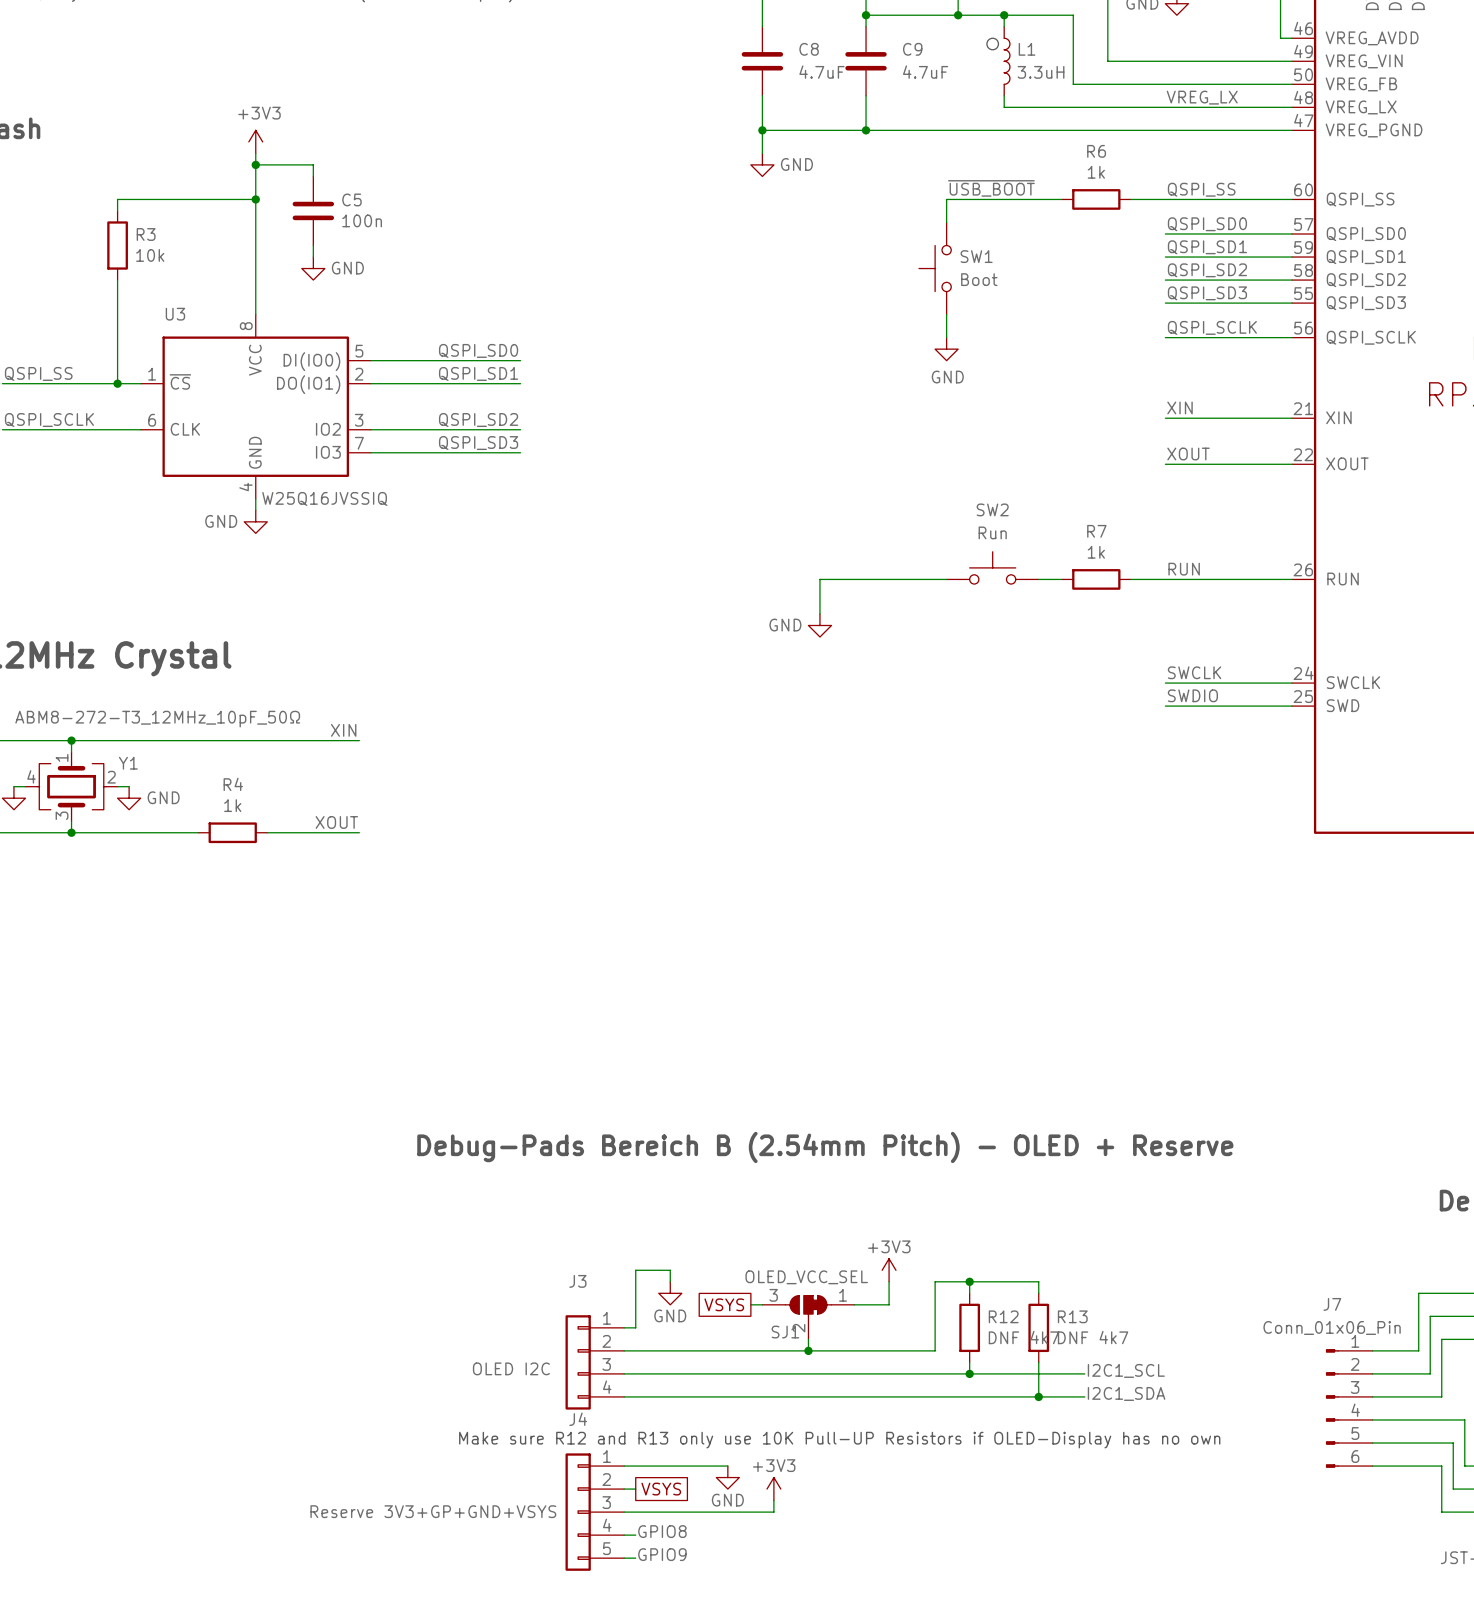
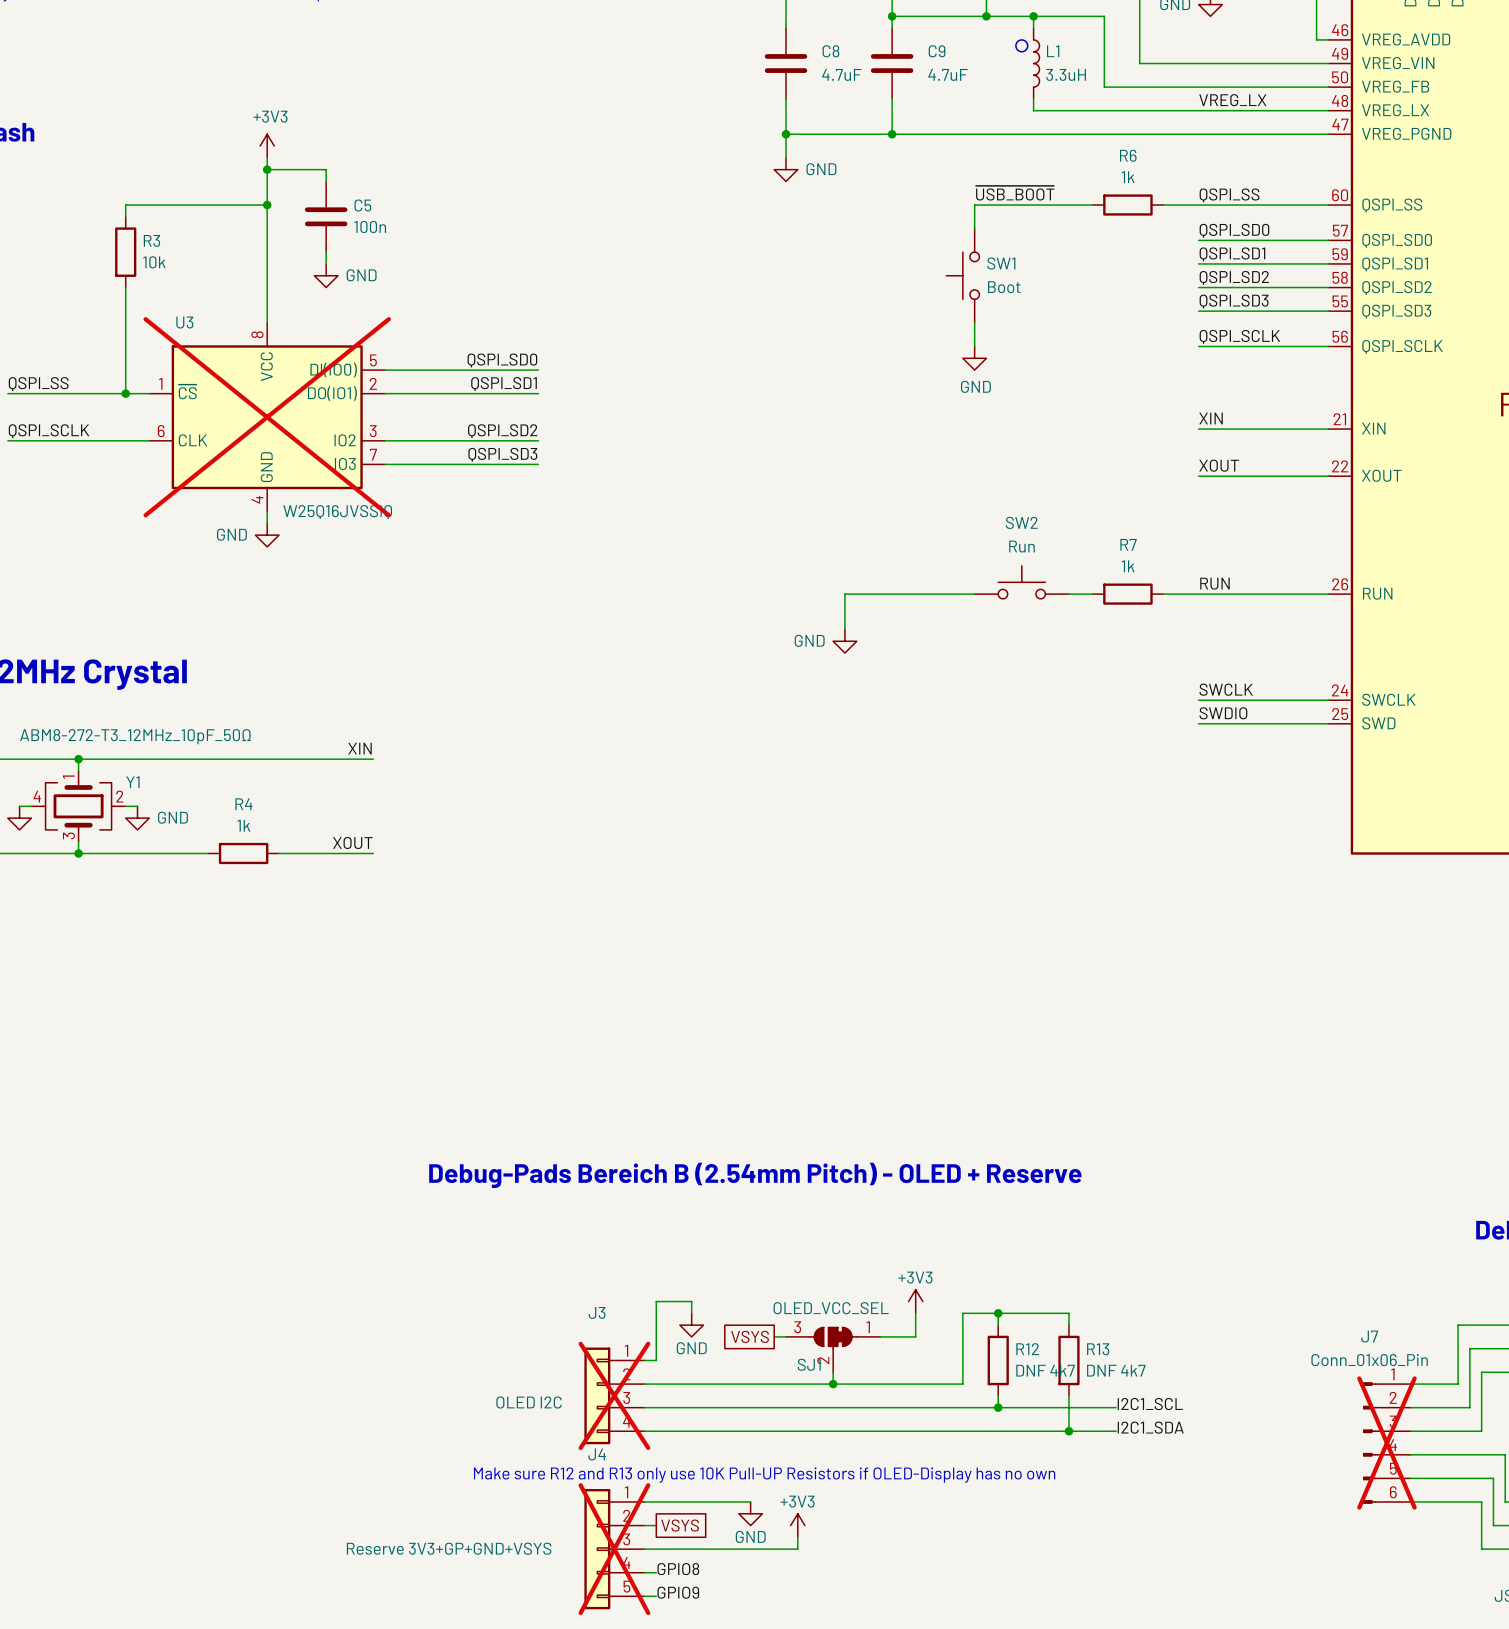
U3 do-not-place cross: none -> (267, 417)
J3 do-not-place cross: none -> (614, 1395)
J7 do-not-place cross: none -> (1386, 1443)
J4 do-not-place cross: none -> (614, 1549)

